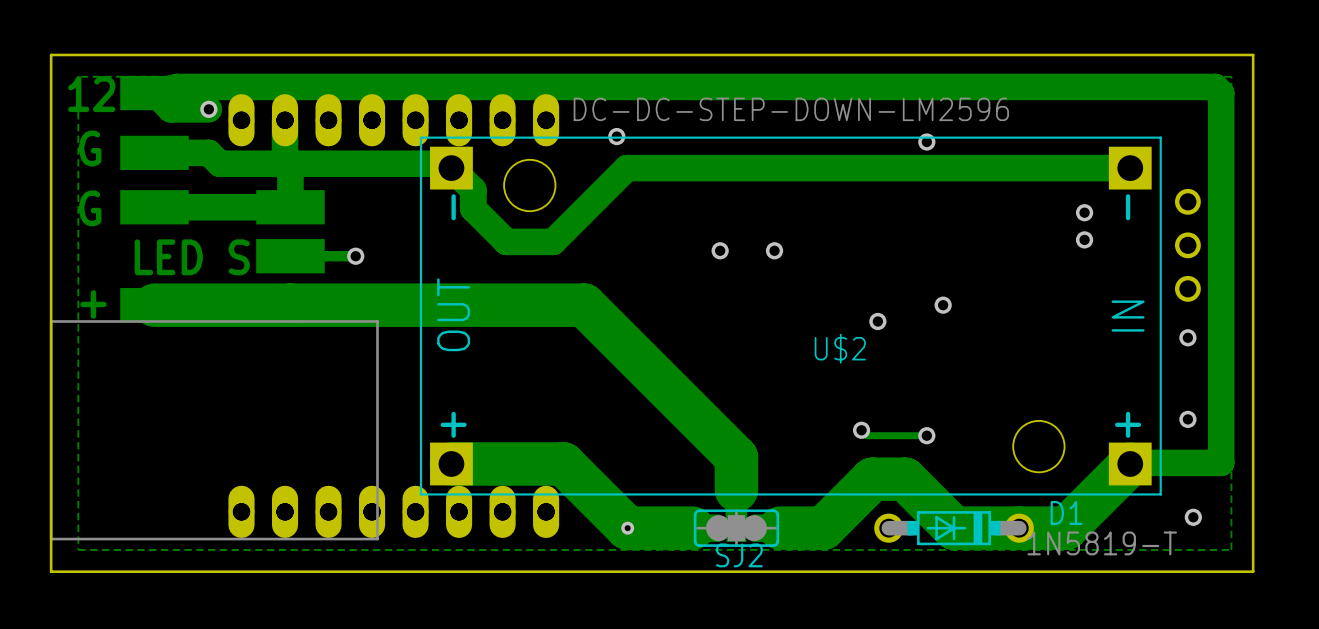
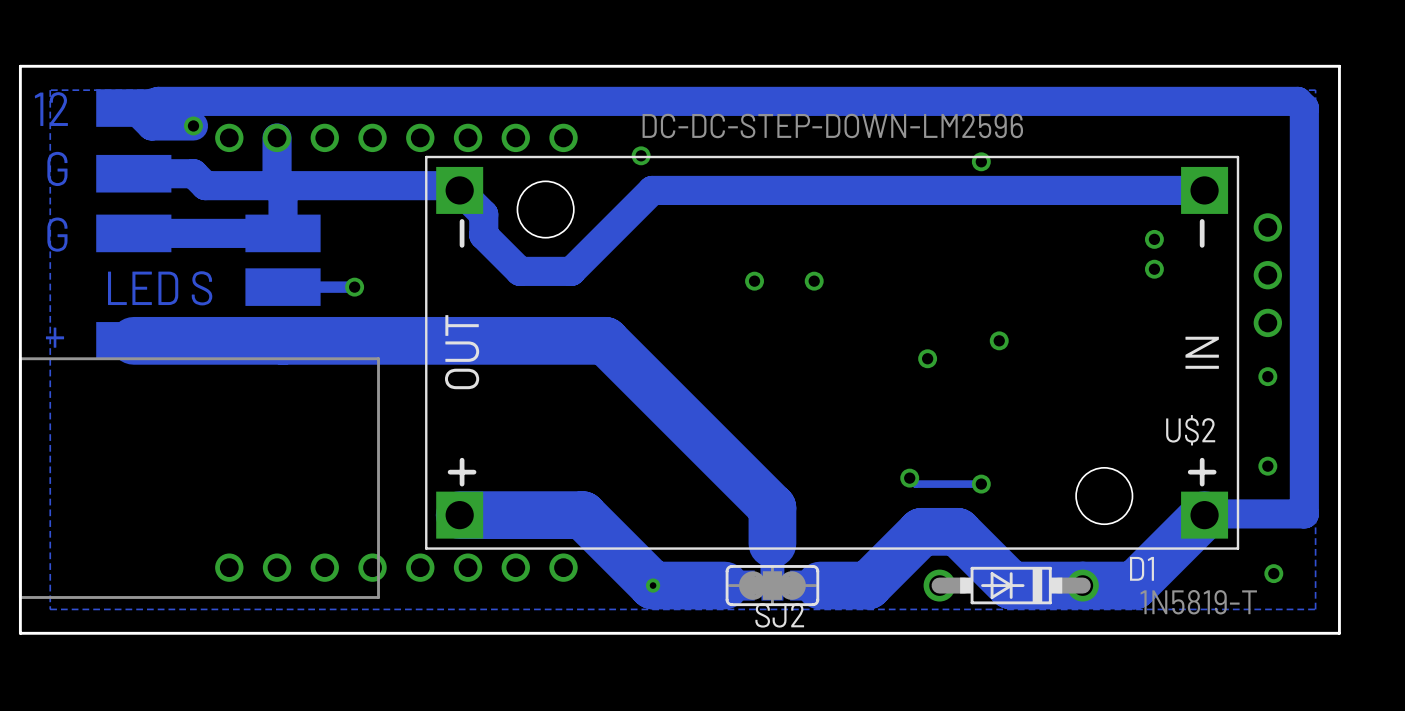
part: (393, 120) -> none
U$2 name position: U$2 (840, 348) -> U$2 (1190, 430)
part: (393, 511) -> none

